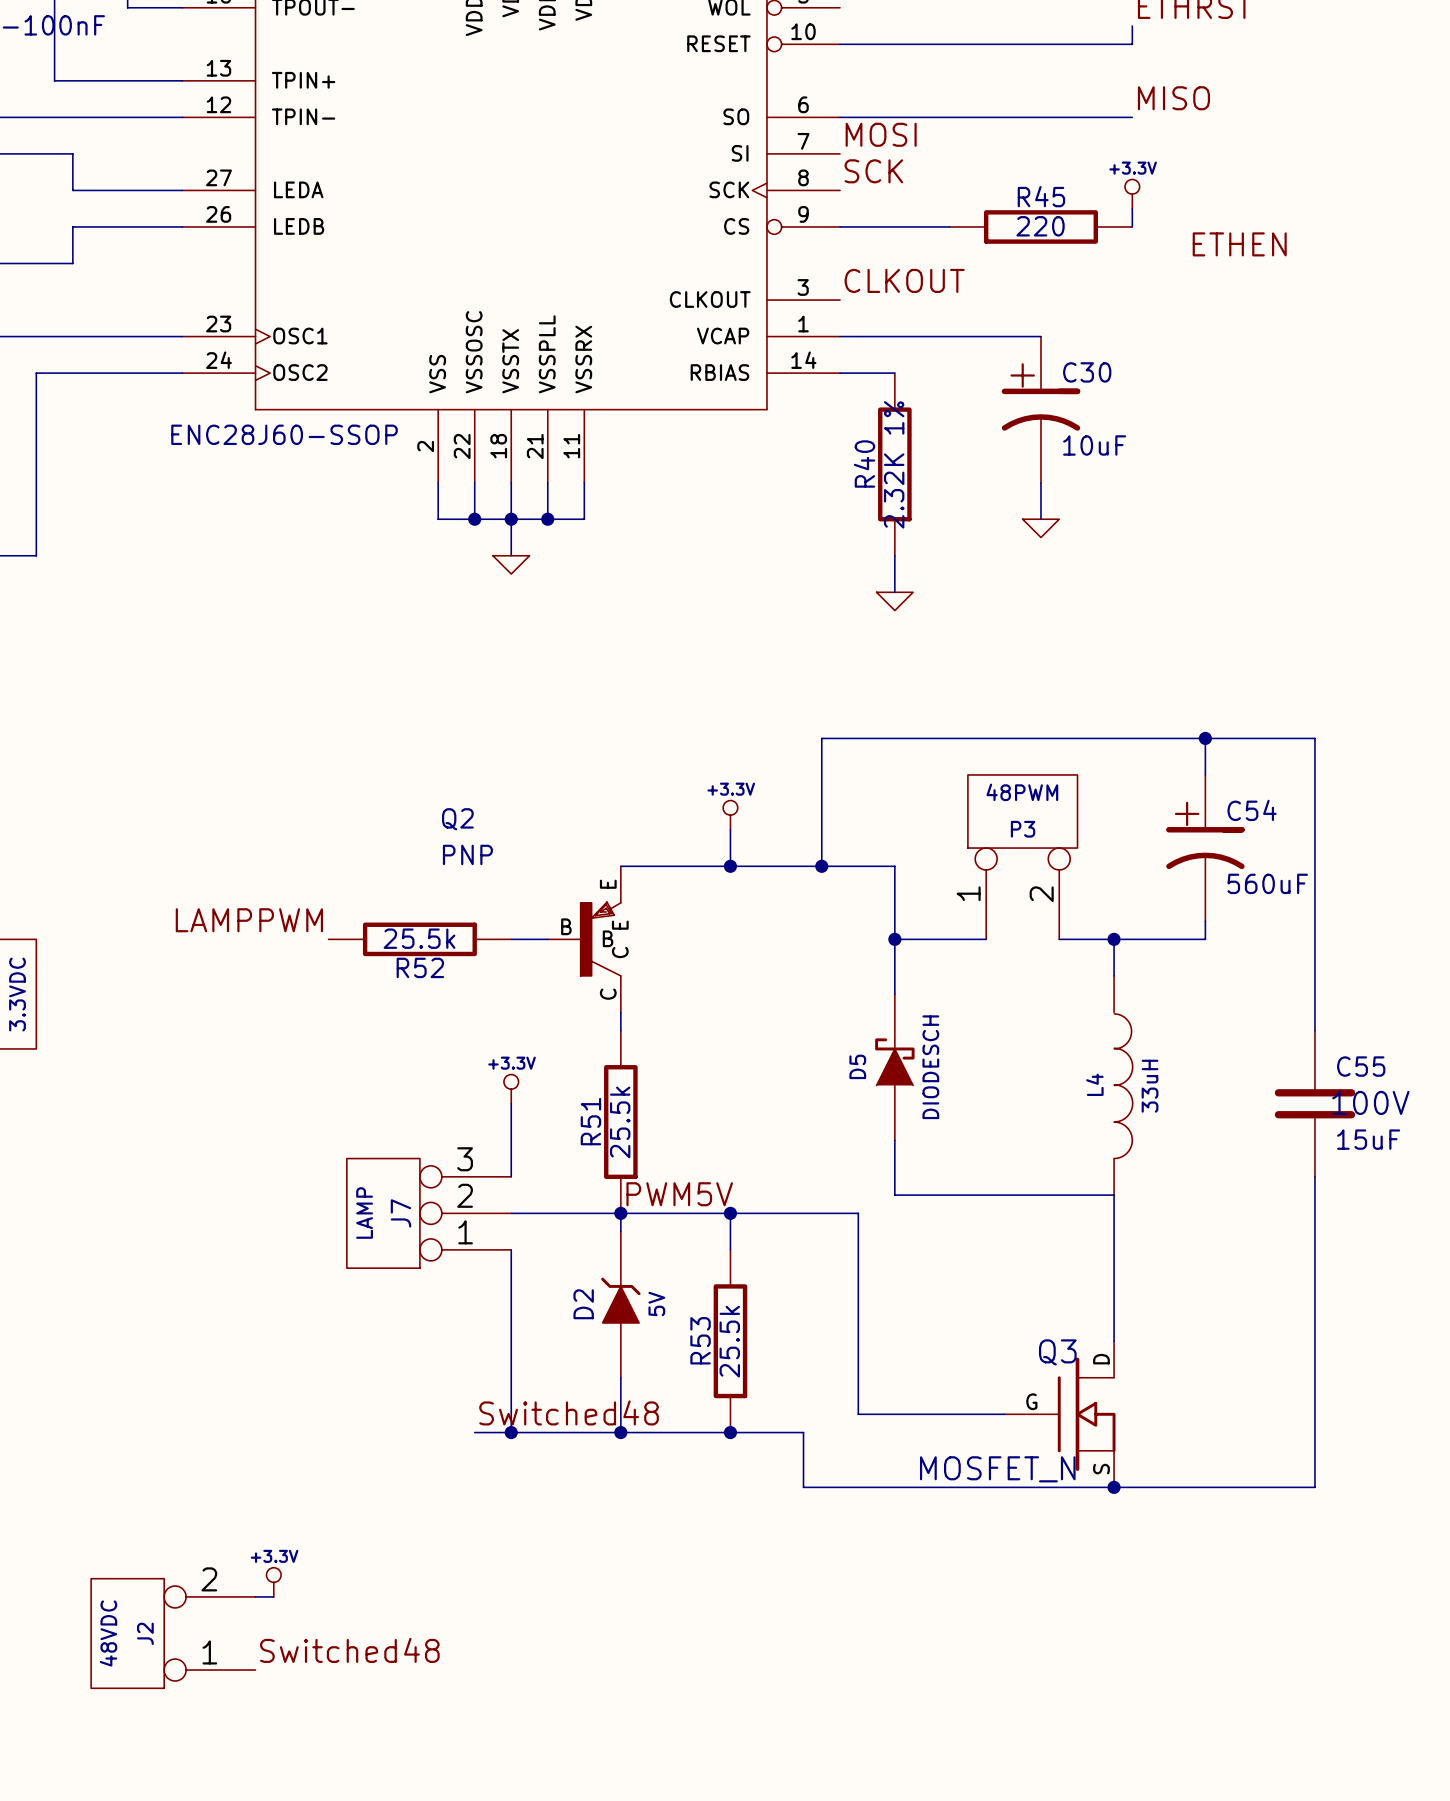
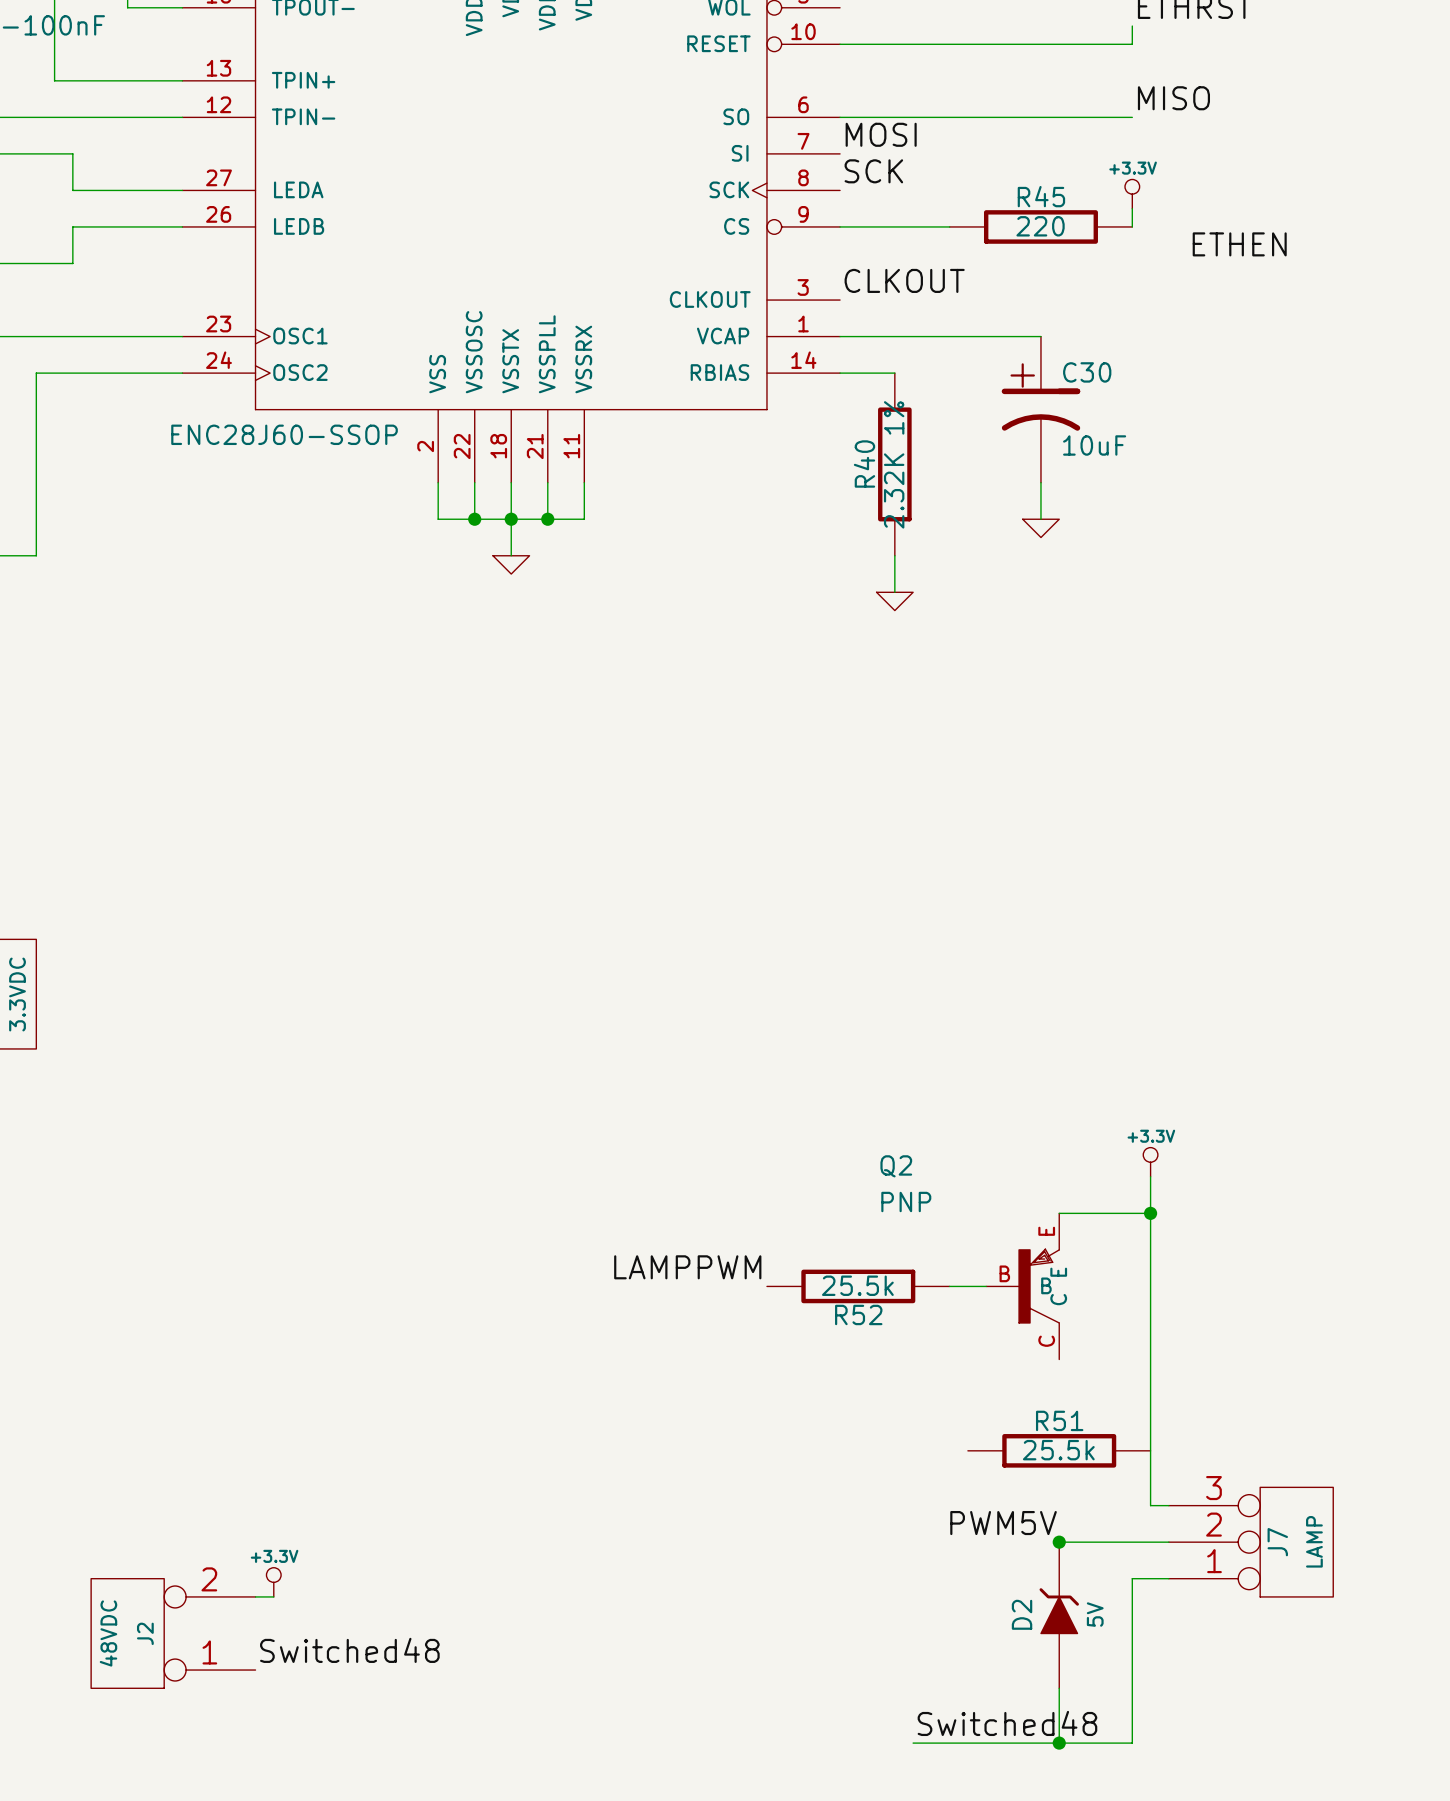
wire: (1205, 738) (1205, 774) -> none
junction: (1205, 738) -> none
power symbol: +3.3V (730, 815) -> none
wire: (730, 829) (730, 866) -> none
C54: 560uF (1205, 848) -> none
P3: 48PWM (1022, 857) -> none
wire: (620, 866) (894, 866) (894, 994) -> none
junction: (730, 866) -> none
wire: (821, 866) (821, 738) (1314, 738) (1314, 1030) -> none
junction: (821, 866) -> none
label: LAMPPWM (249, 920) -> none
wire: (1205, 921) (1205, 939) (1059, 939) -> none
R52 position: (419, 939) -> (858, 1286)
wire: (511, 939) (547, 939) -> none
Q2 position: (584, 939) -> (1022, 1286)
wire: (894, 939) (986, 939) -> (1059, 1213) (1150, 1213)
junction: (894, 939) -> none
wire: (1114, 939) (1114, 975) -> none
junction: (1114, 939) -> none
wire: (620, 1012) (620, 1030) -> none
D5: DIODESCH (894, 1067) -> none
L4: 33uH (1123, 1085) -> none
power symbol: +3.3V (511, 1089) -> none
wire: (511, 1103) (511, 1176) -> none
C55: 15uF (1314, 1103) -> none
R51 rotation: 0° (620, 1122) -> 90° clockwise (1059, 1450)
R51 position: (620, 1122) -> (1059, 1450)
wire: (894, 1140) (894, 1195) (1114, 1195) (1114, 1341) -> none
power symbol: none -> +3.3V (1150, 1162)
wire: none -> (1150, 1176) (1150, 1505) (1168, 1505)
wire: (1314, 1176) (1314, 1487) (803, 1487) (803, 1432) (474, 1432) -> none
label: PWM5V (679, 1194) -> none
J7 flip: as is (383, 1213) -> left-right (1296, 1542)
J7 position: (429, 1213) -> (1251, 1542)
wire: (511, 1213) (858, 1213) (858, 1414) (1004, 1414) -> none
wire: (620, 1213) (620, 1231) -> none
junction: (620, 1213) -> none
wire: (730, 1213) (730, 1249) -> none
junction: (730, 1213) -> none
junction: none -> (1150, 1213)
wire: (511, 1249) (511, 1432) -> none
label: none -> LAMPPWM (687, 1267)
wire: none -> (949, 1286) (986, 1286)
D2 position: (620, 1304) -> (1059, 1615)
R53: 25.5k (730, 1341) -> none
wire: (620, 1377) (620, 1432) -> none
label: Switched48 (569, 1412) -> none
Q3: MOSFET_N (1059, 1414) -> none
junction: (511, 1432) -> none
junction: (620, 1432) -> none
junction: (730, 1432) -> none
junction position: (1114, 1487) -> (1059, 1542)
label: none -> PWM5V (1003, 1523)
wire: none -> (1059, 1542) (1168, 1542)
wire: none -> (1168, 1578) (1132, 1578) (1132, 1743) (913, 1743)
wire: none -> (1059, 1688) (1059, 1743)
label: none -> Switched48 (1007, 1723)
junction: none -> (1059, 1743)

